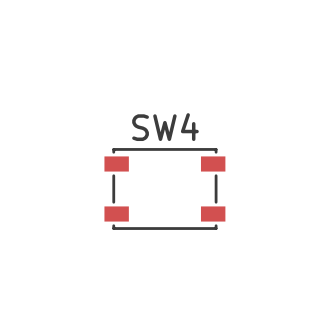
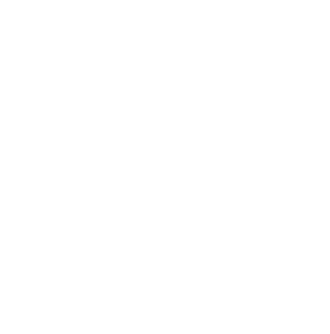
SW4: (164, 188) -> none

